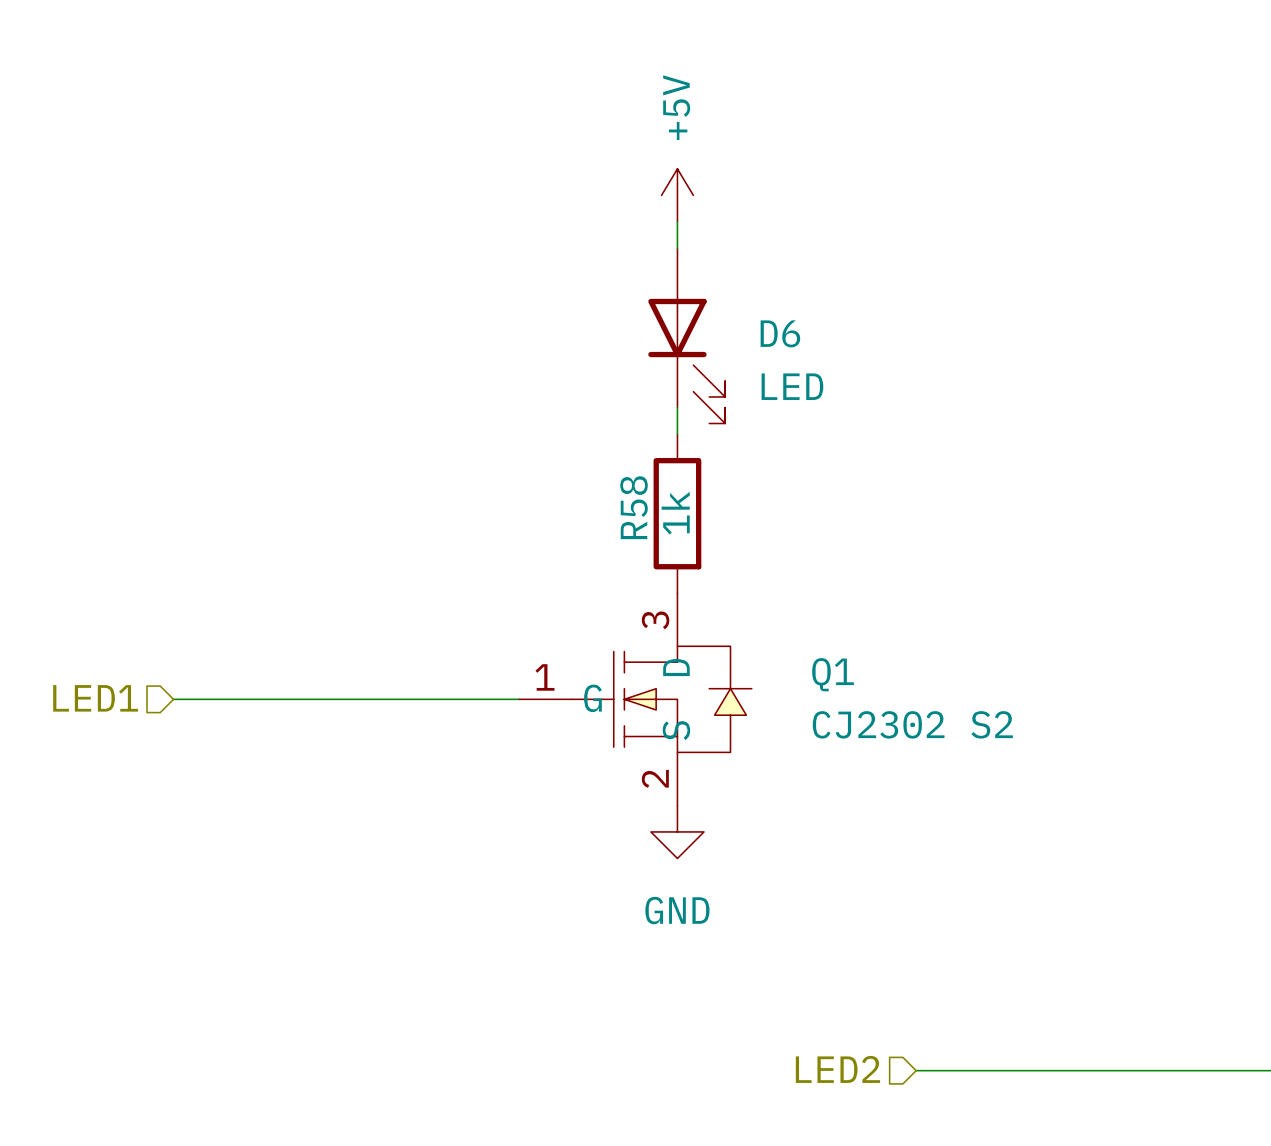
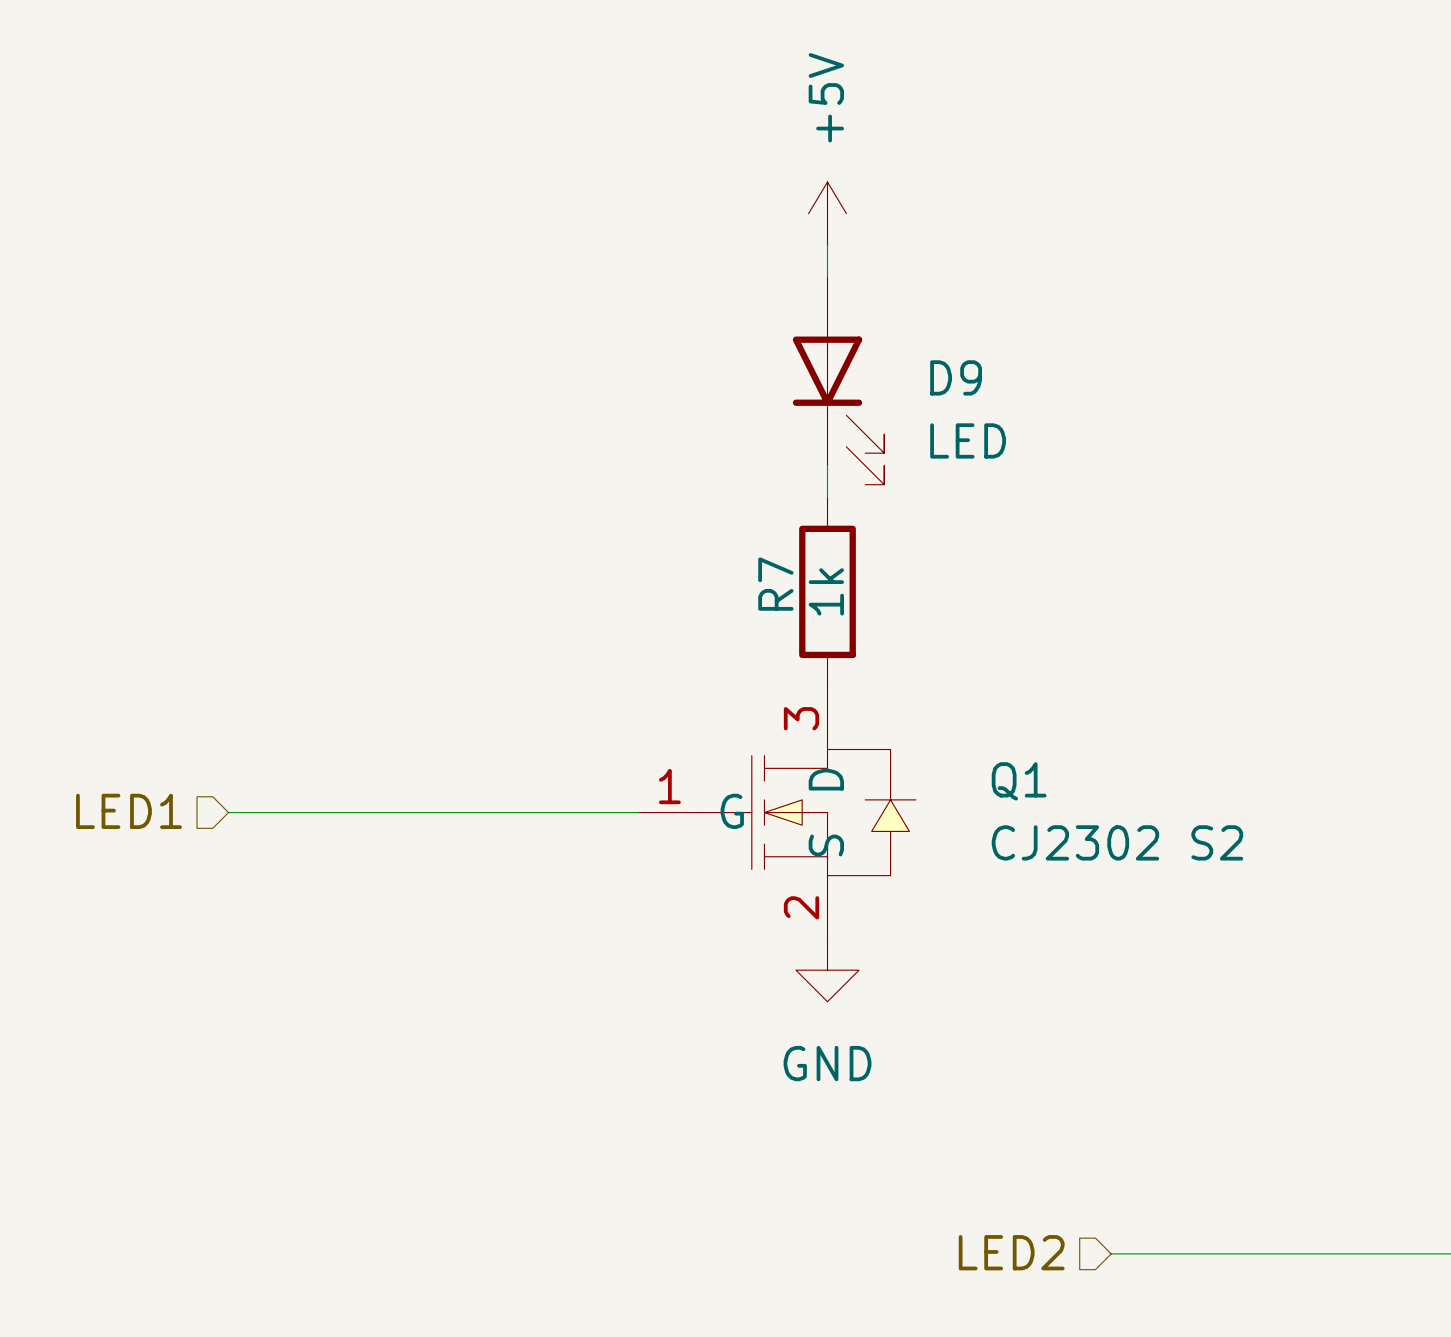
D6 name: D6 (780, 333) -> D9 (956, 377)
R58 name: R58 (634, 507) -> R7 (775, 584)

